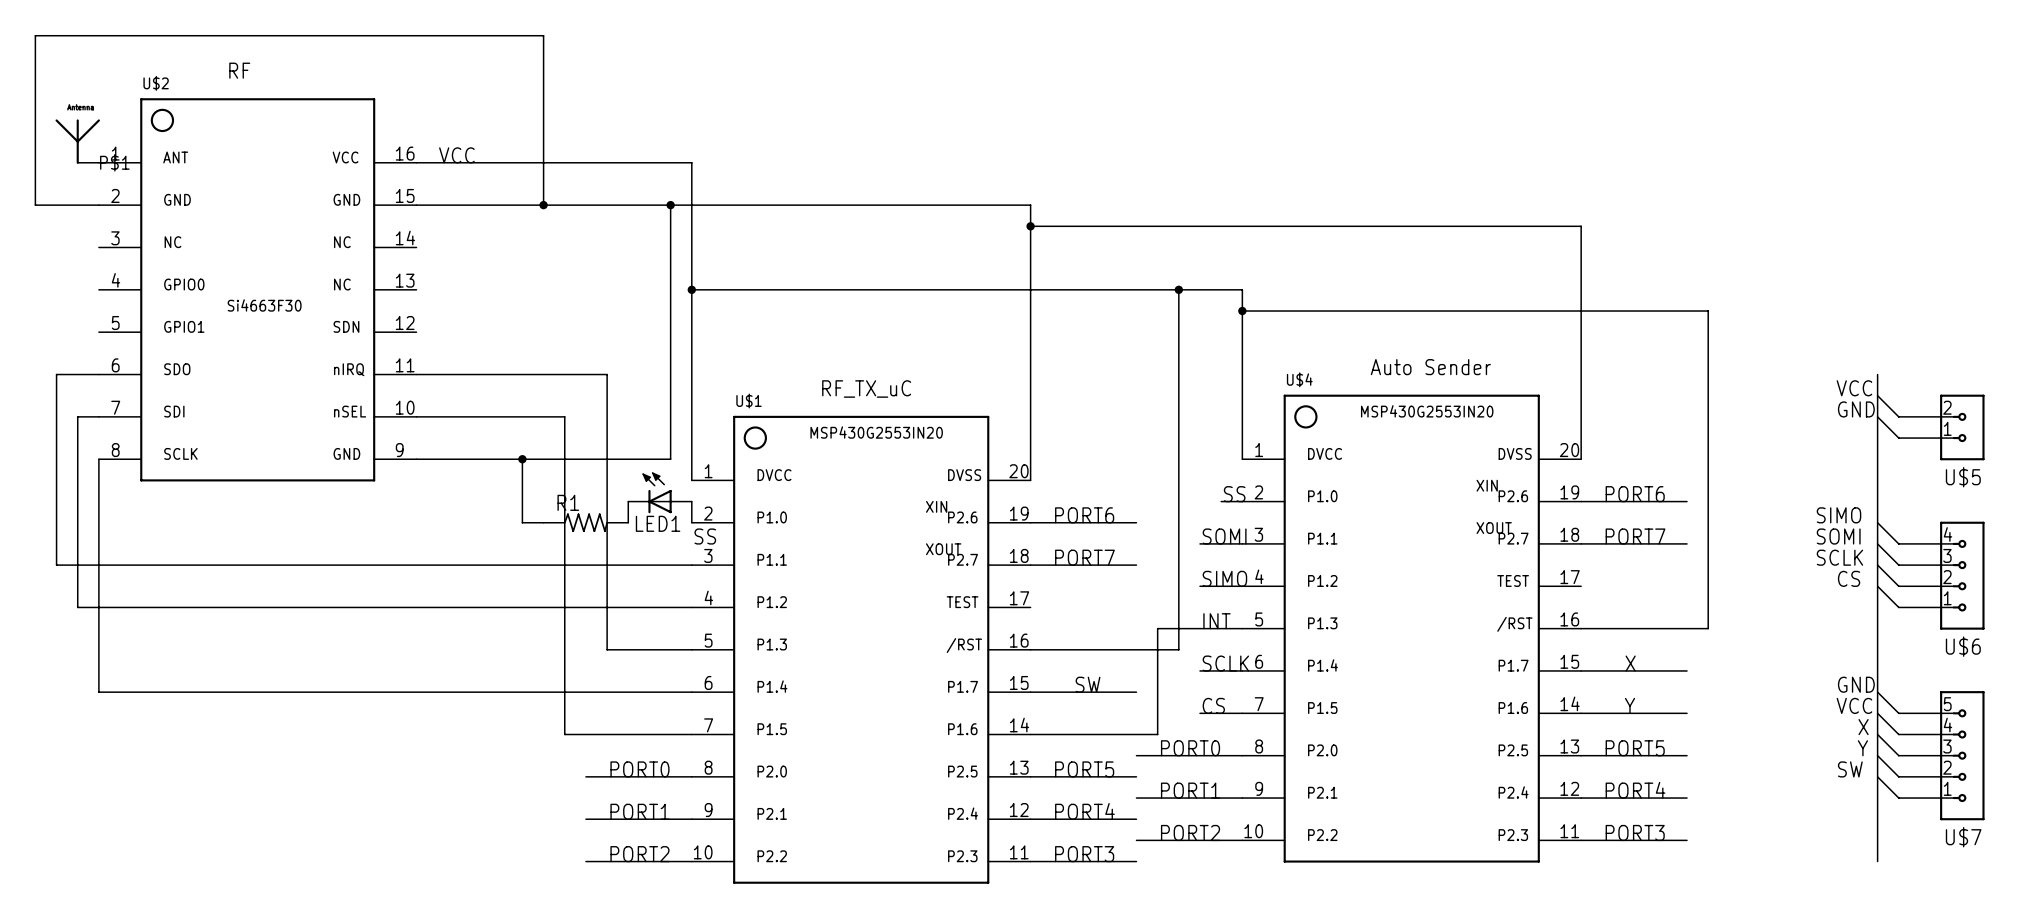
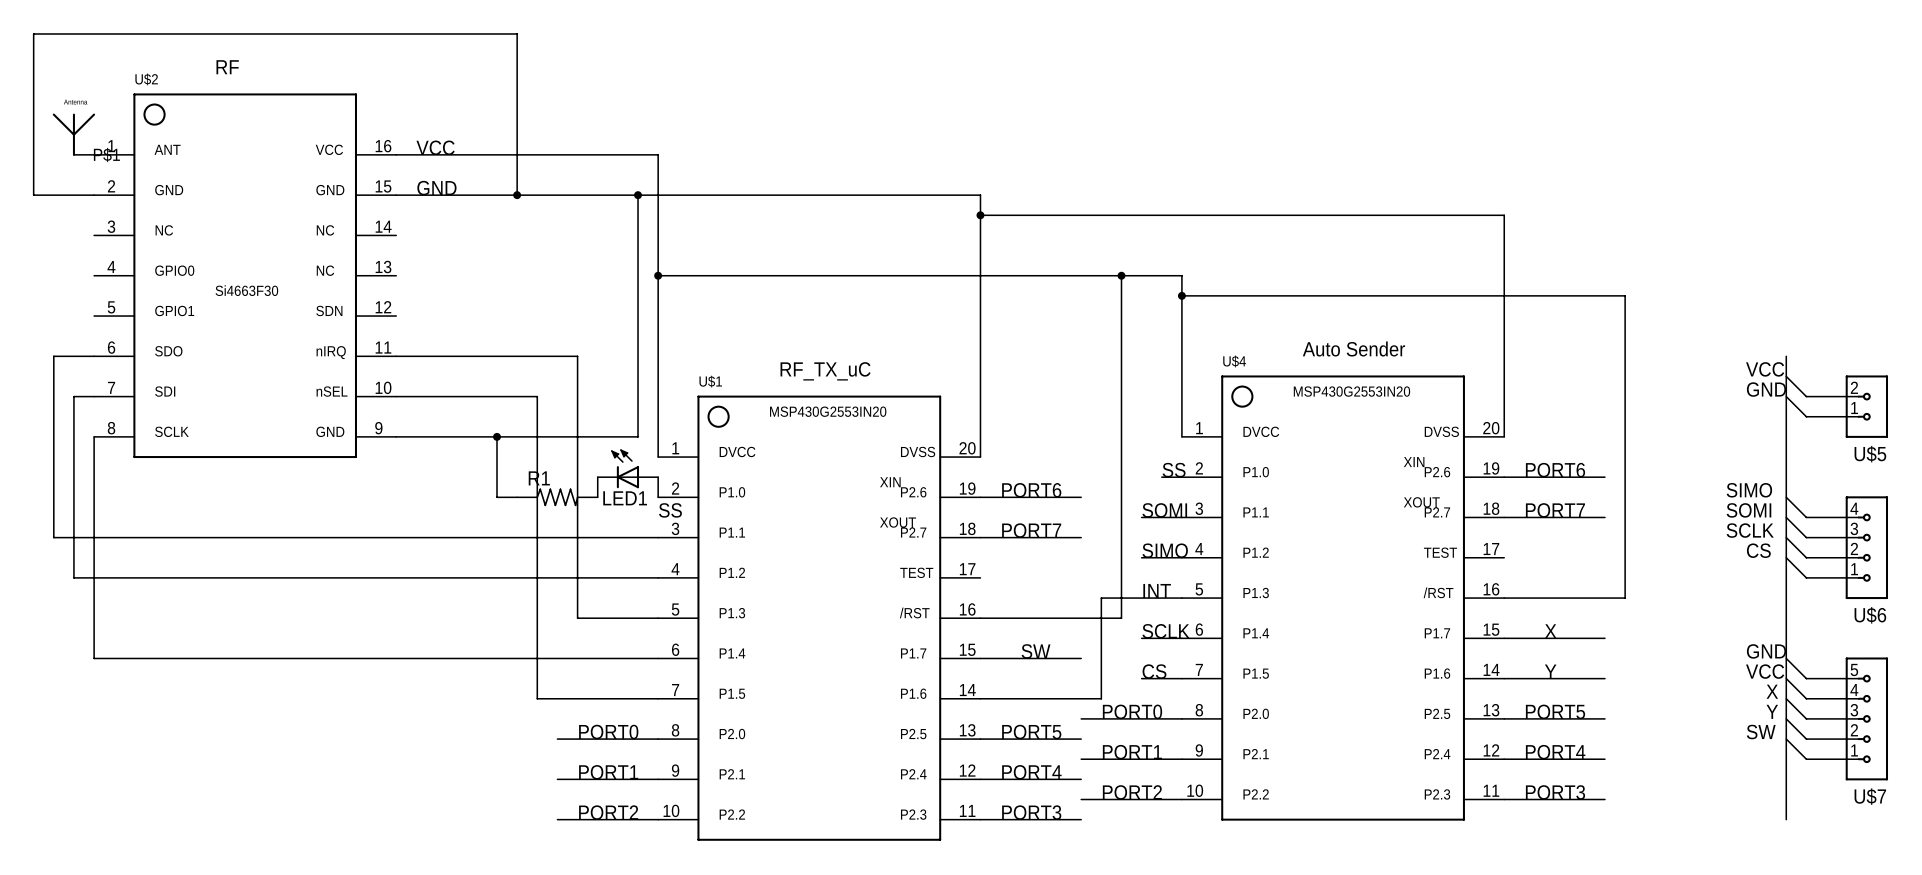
label: none -> GND (436, 188)

